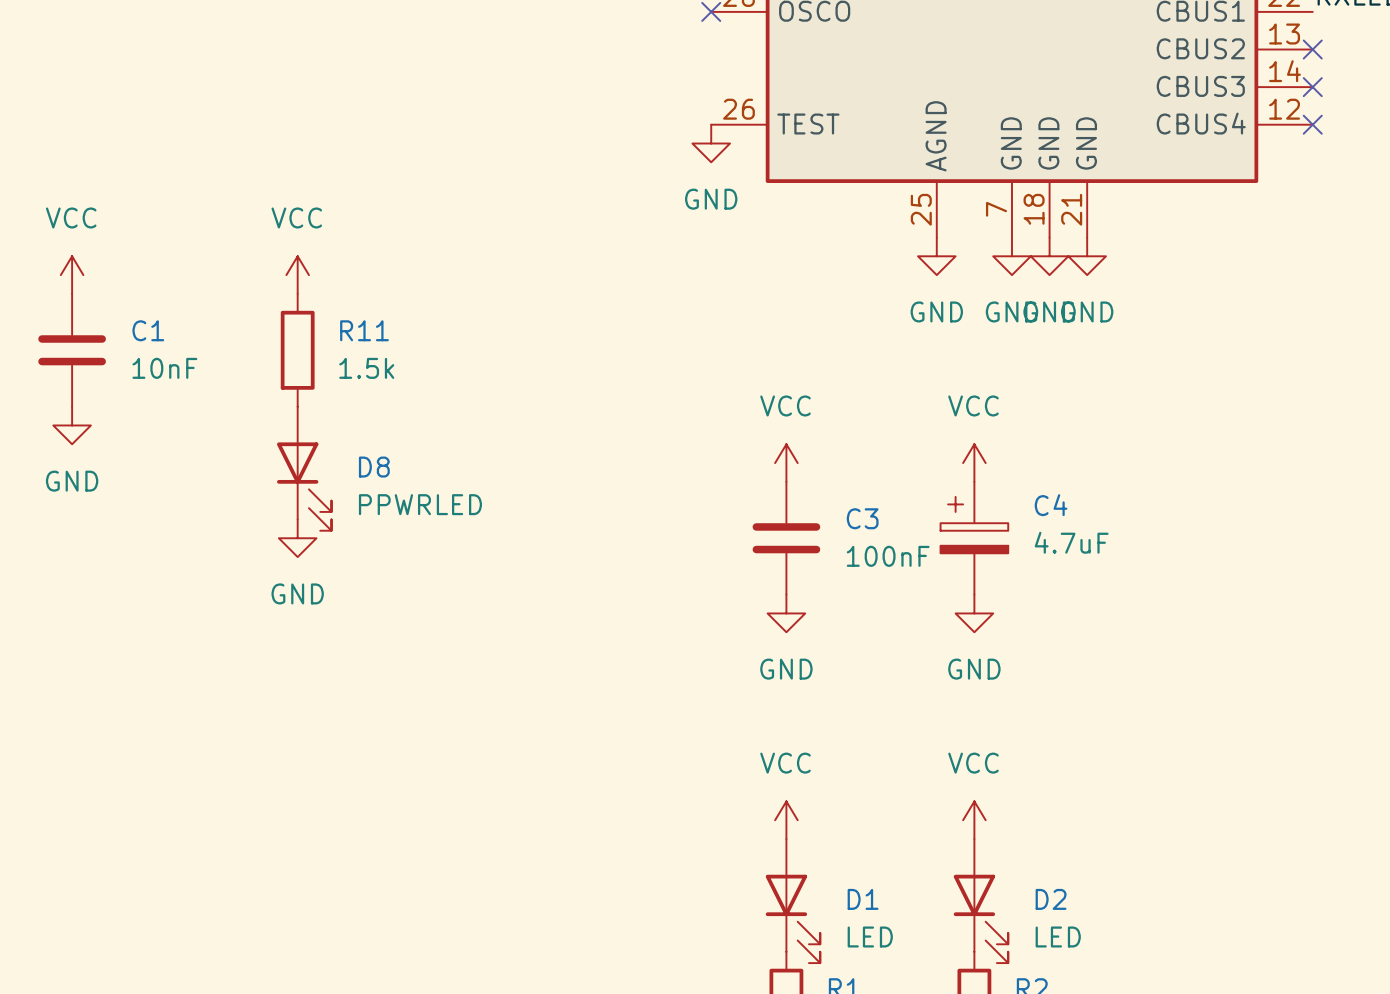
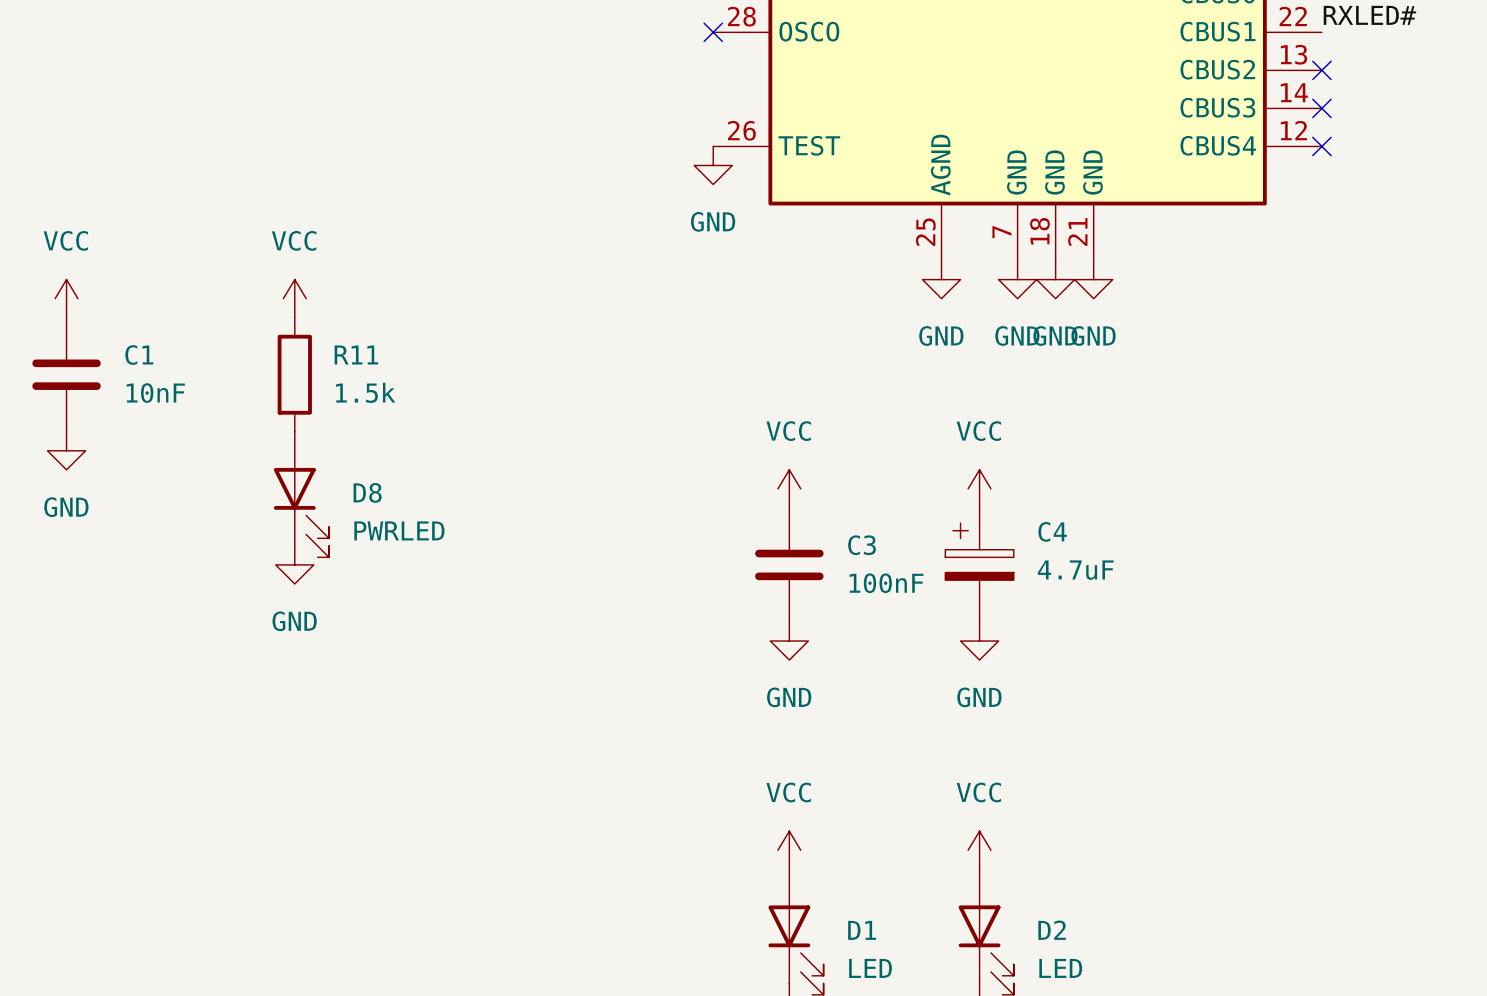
D8 value: PPWRLED (420, 504) -> PWRLED (399, 530)

